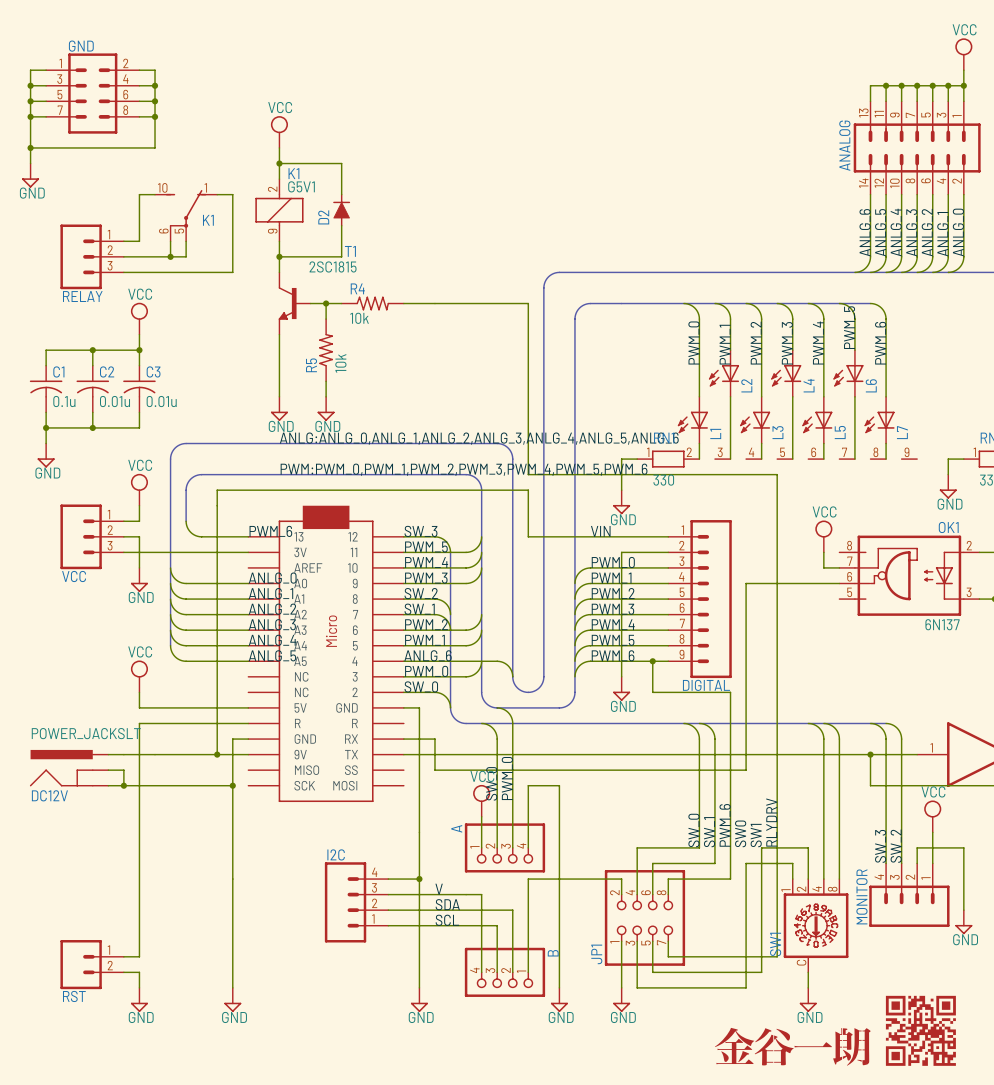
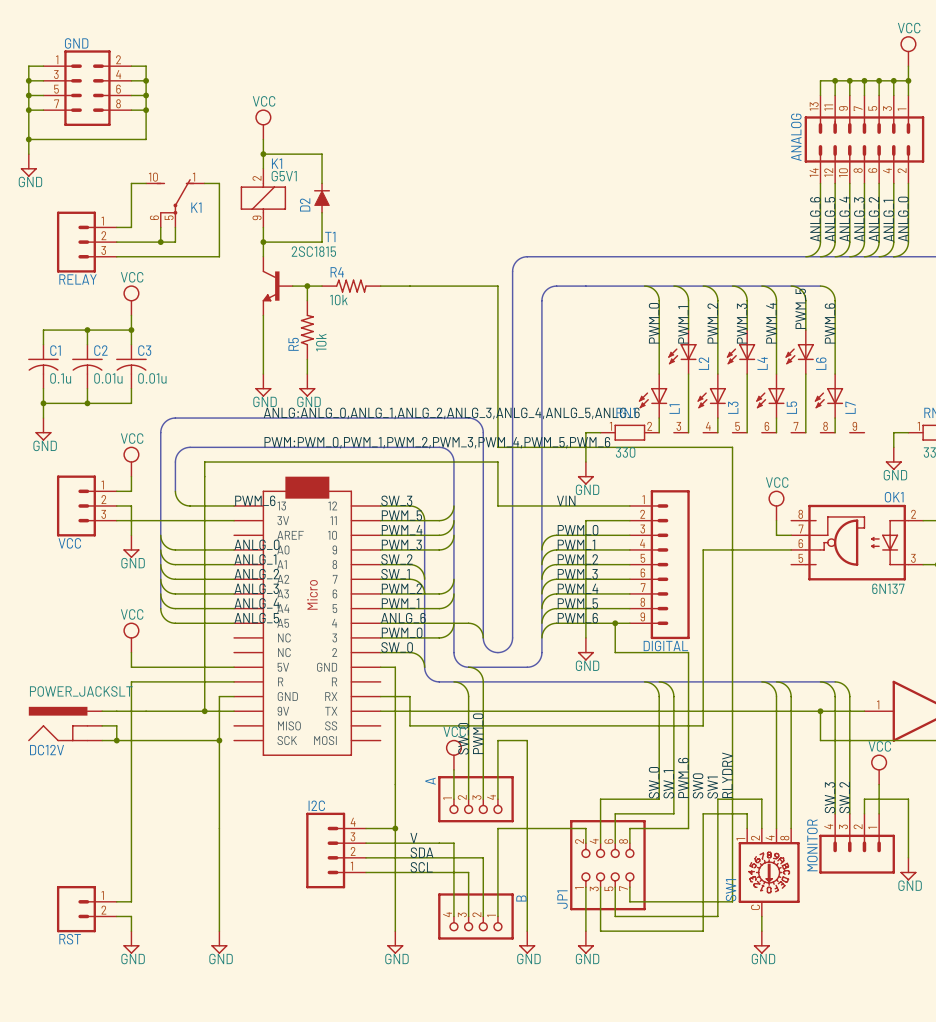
part: (920, 1030) -> none
part: (792, 1046) -> none

